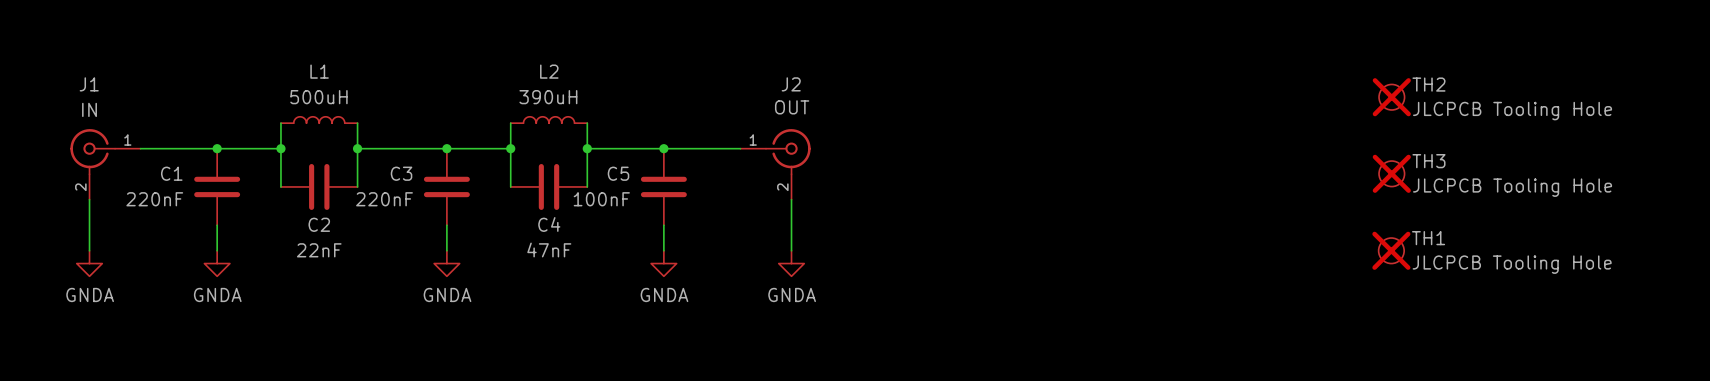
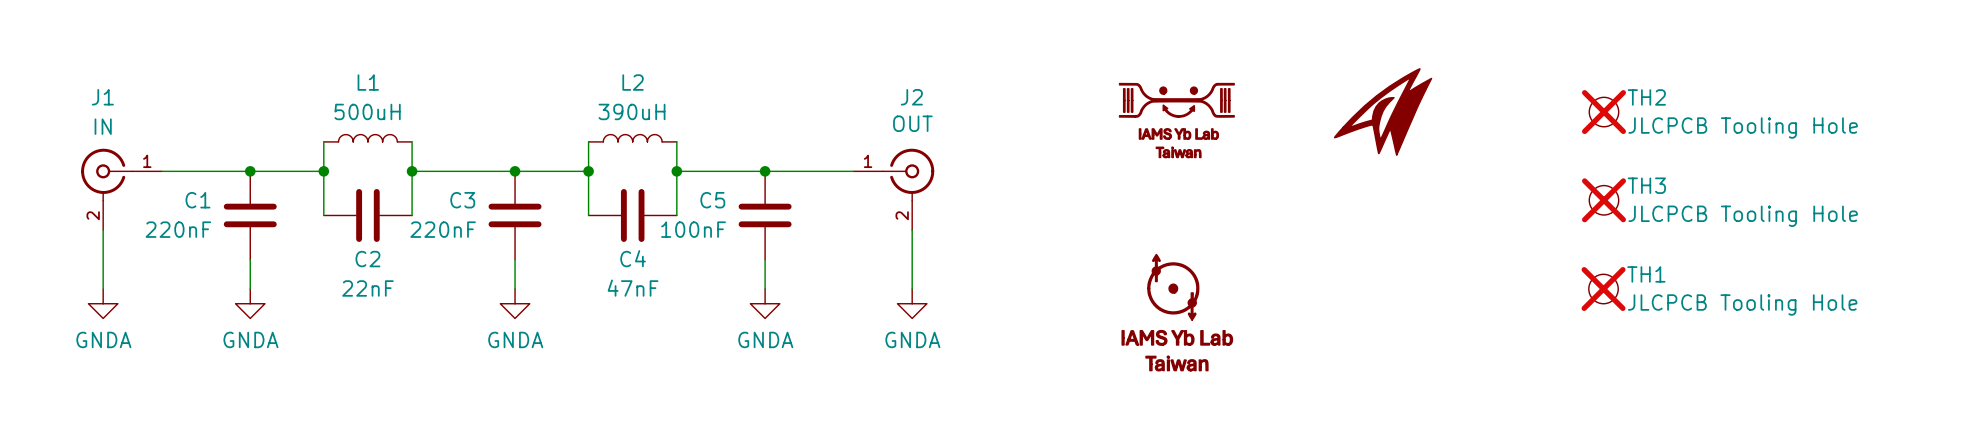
part: none -> (1383, 111)
part: none -> (1176, 120)
part: none -> (1177, 312)

